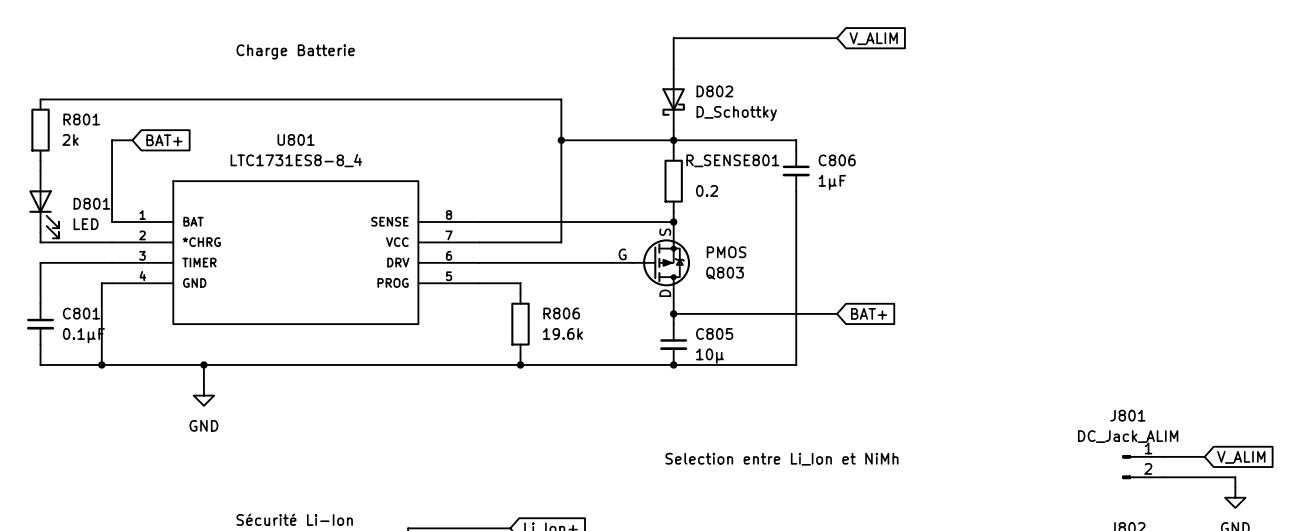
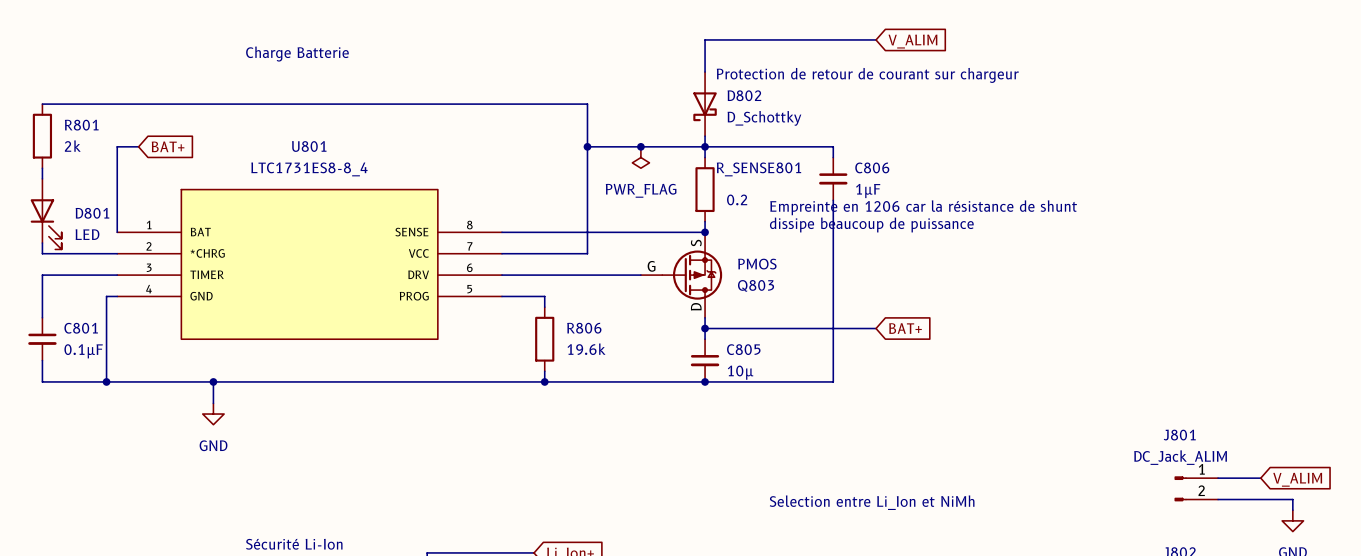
text: none -> Protection de retour de courant sur chargeur (867, 75)
junction: none -> (640, 146)
power symbol: none -> PWR_FLAG (640, 157)
text: none -> Empreinte en 1206 car la résistance de shunt (923, 207)
text: none -> dissipe beaucoup de puissance (871, 224)
text position: Selection entre Li_Ion et NiMh (781, 459) -> Selection entre Li_Ion et NiMh (872, 502)

